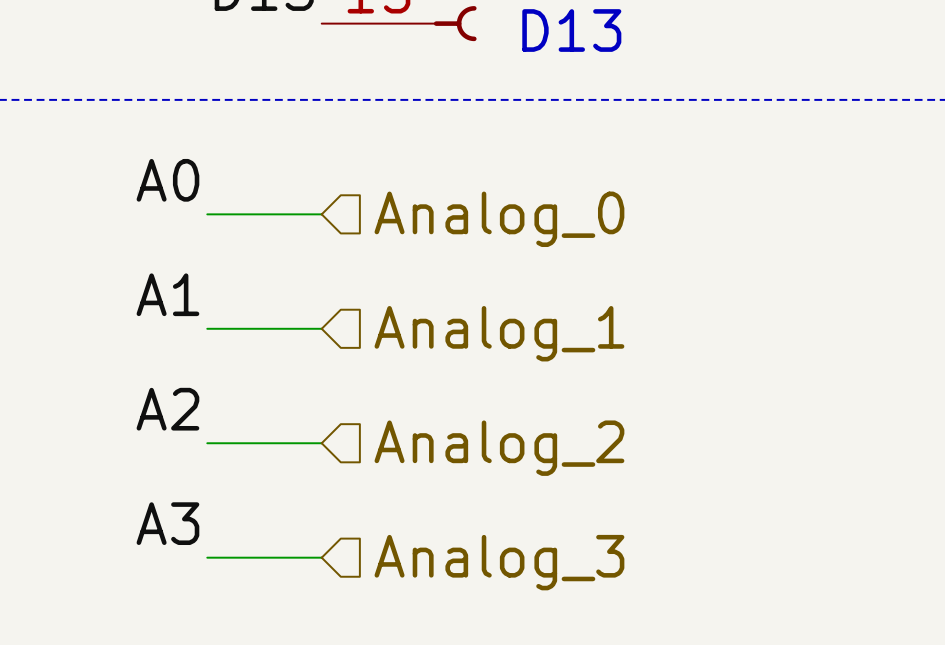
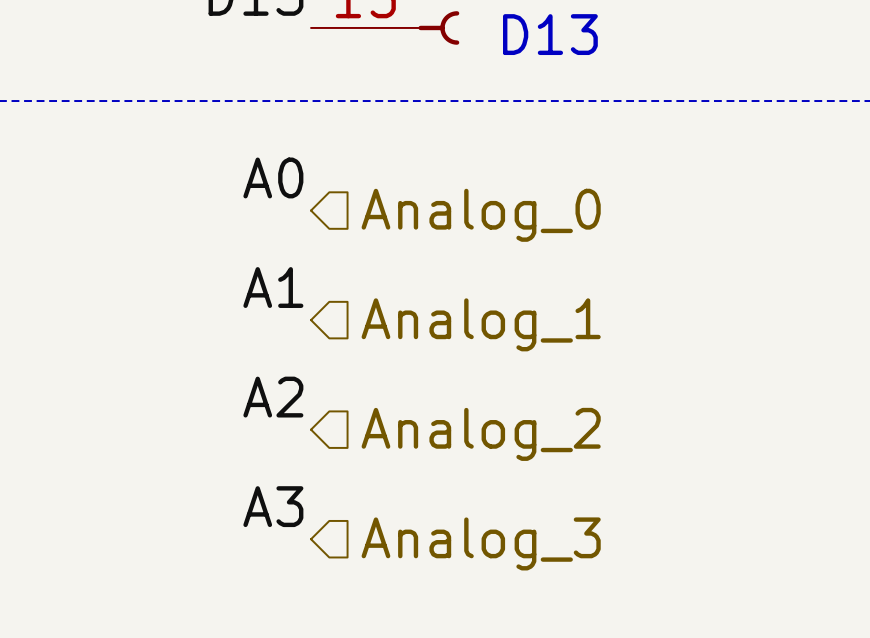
label position: A0 (167, 180) -> A0 (273, 177)
wire: (207, 214) (321, 214) -> none
label position: A1 (167, 294) -> A1 (273, 287)
wire: (207, 328) (321, 328) -> none
label position: A2 (167, 409) -> A2 (273, 397)
wire: (207, 443) (321, 443) -> none
label position: A3 (167, 523) -> A3 (273, 506)
wire: (207, 557) (321, 557) -> none

